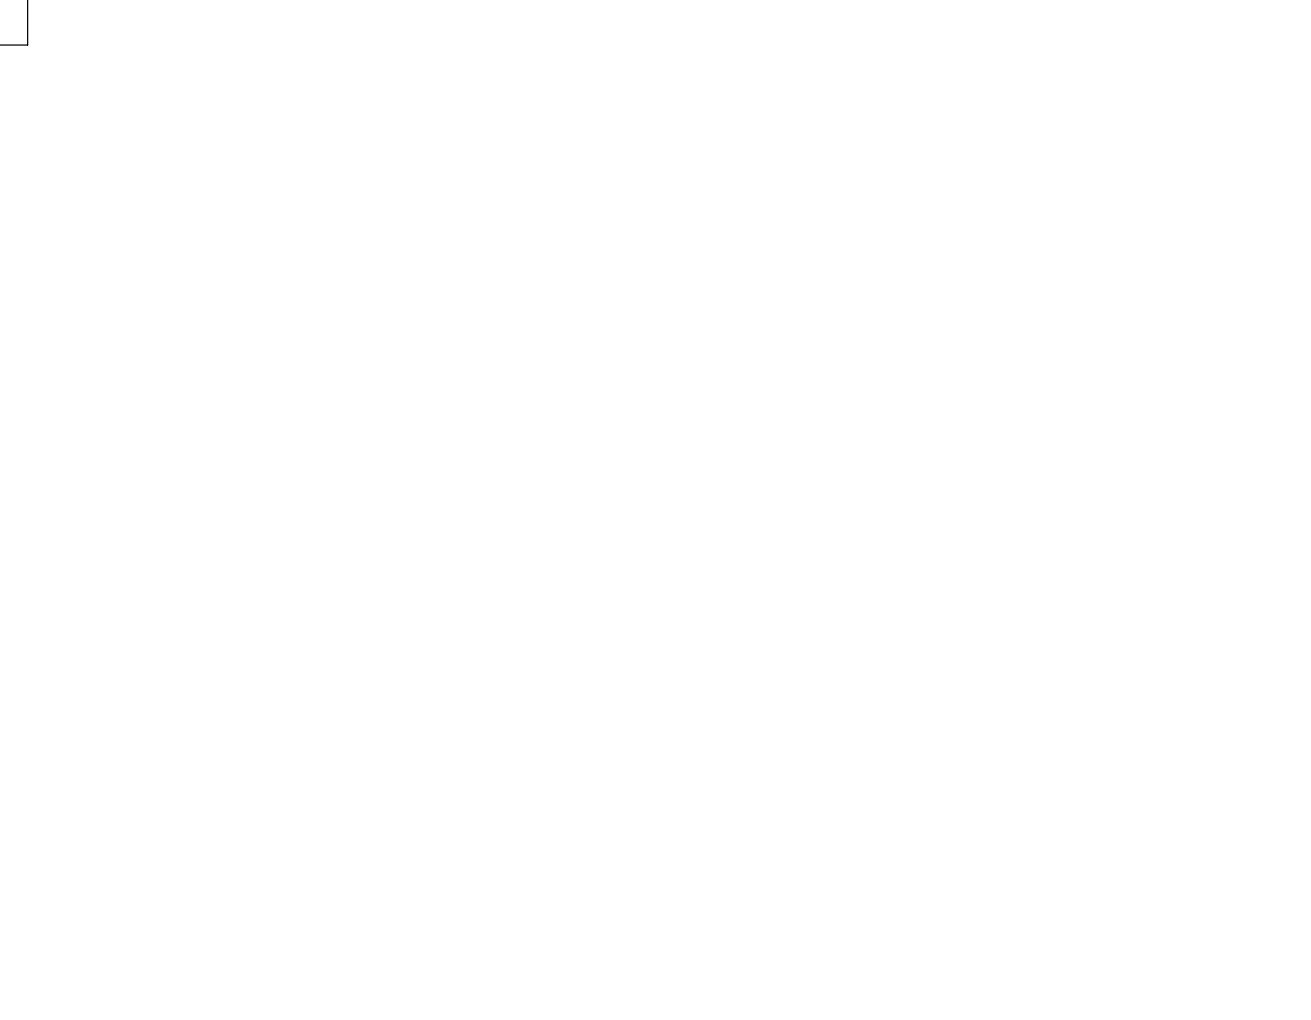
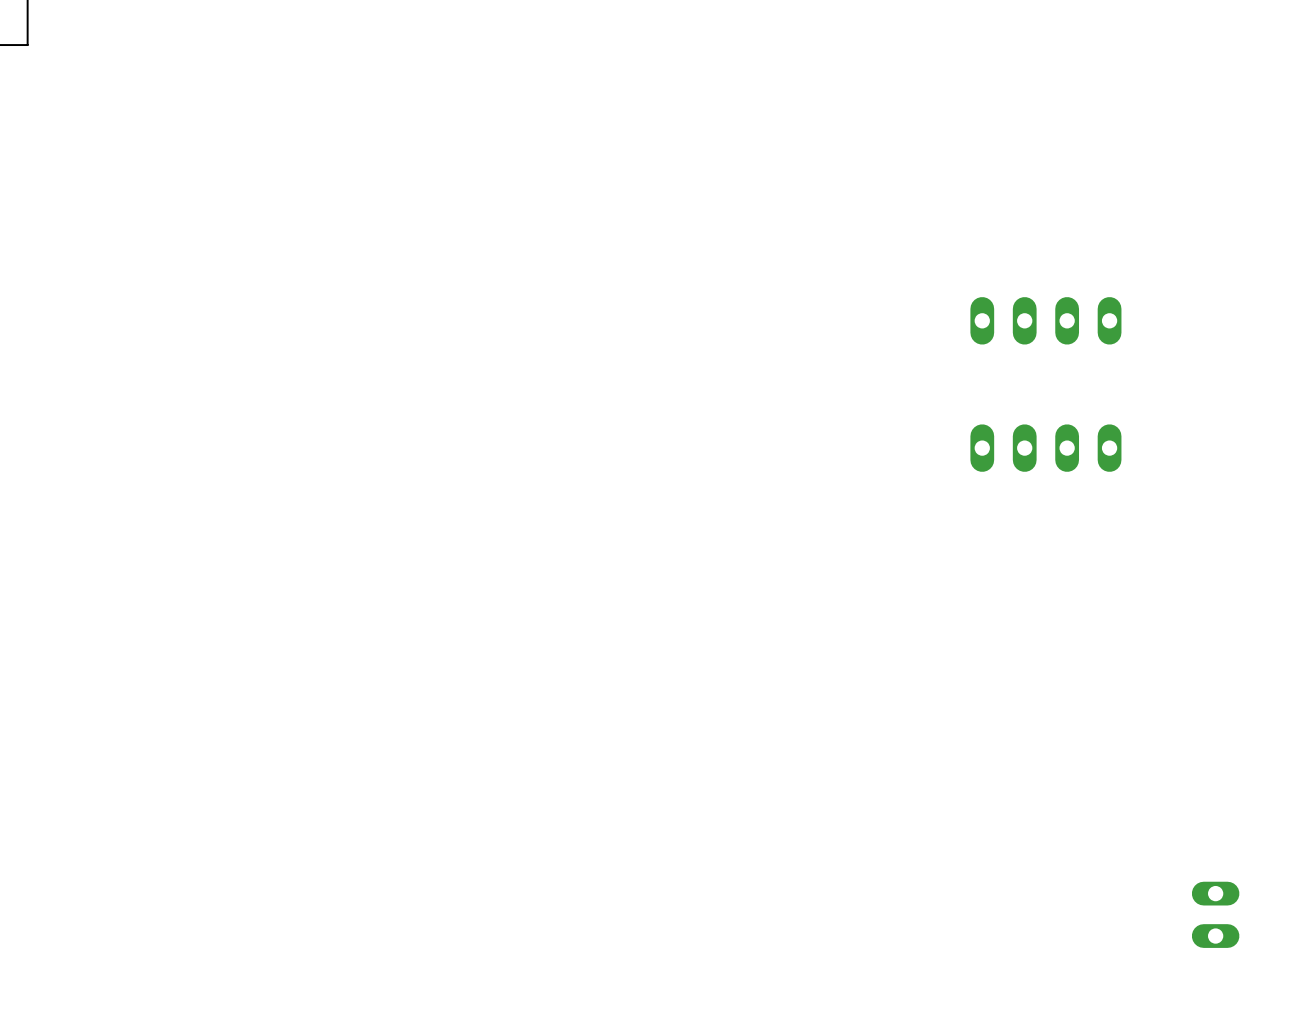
part: none -> (1045, 320)
part: none -> (1045, 448)
part: none -> (1215, 914)

